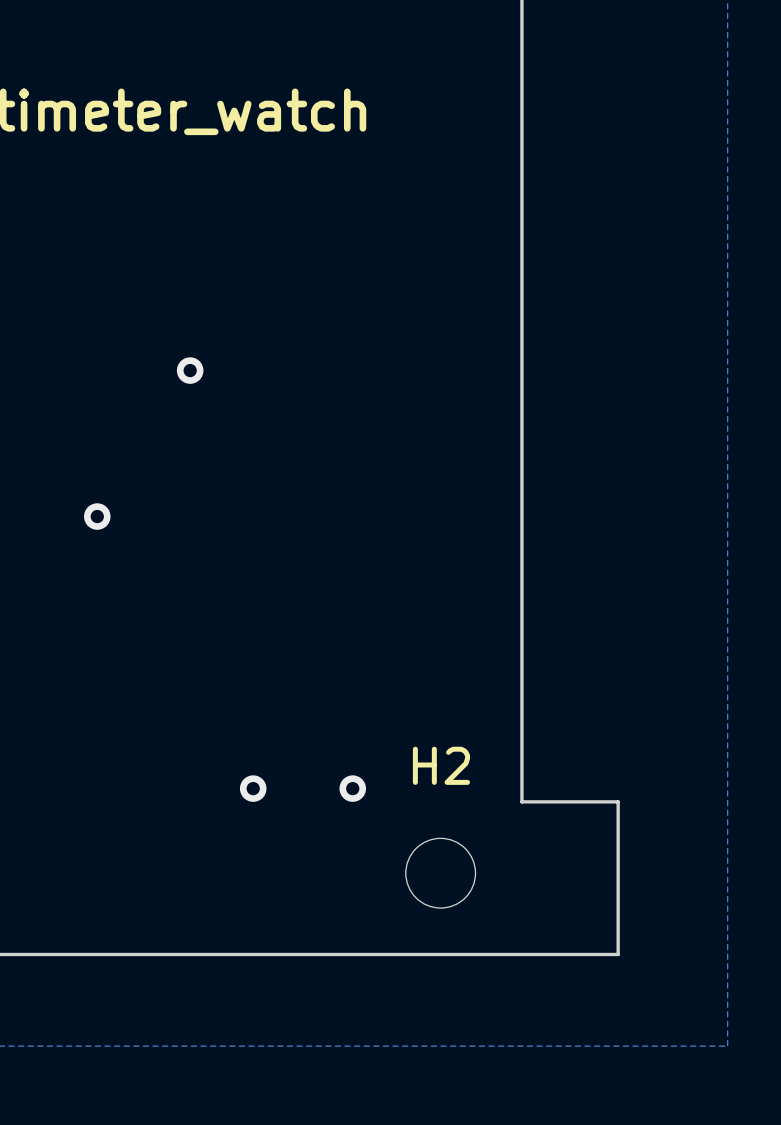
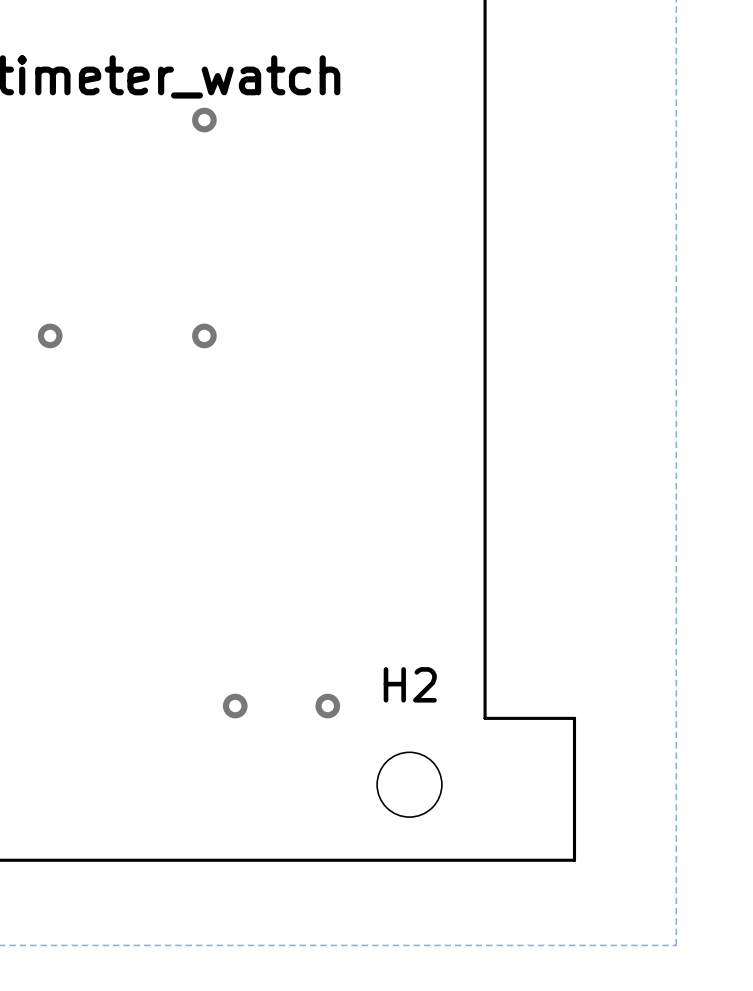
via: none -> (204, 120)
via position: (190, 370) -> (204, 335)
via: none -> (50, 335)
via: (97, 516) -> none

